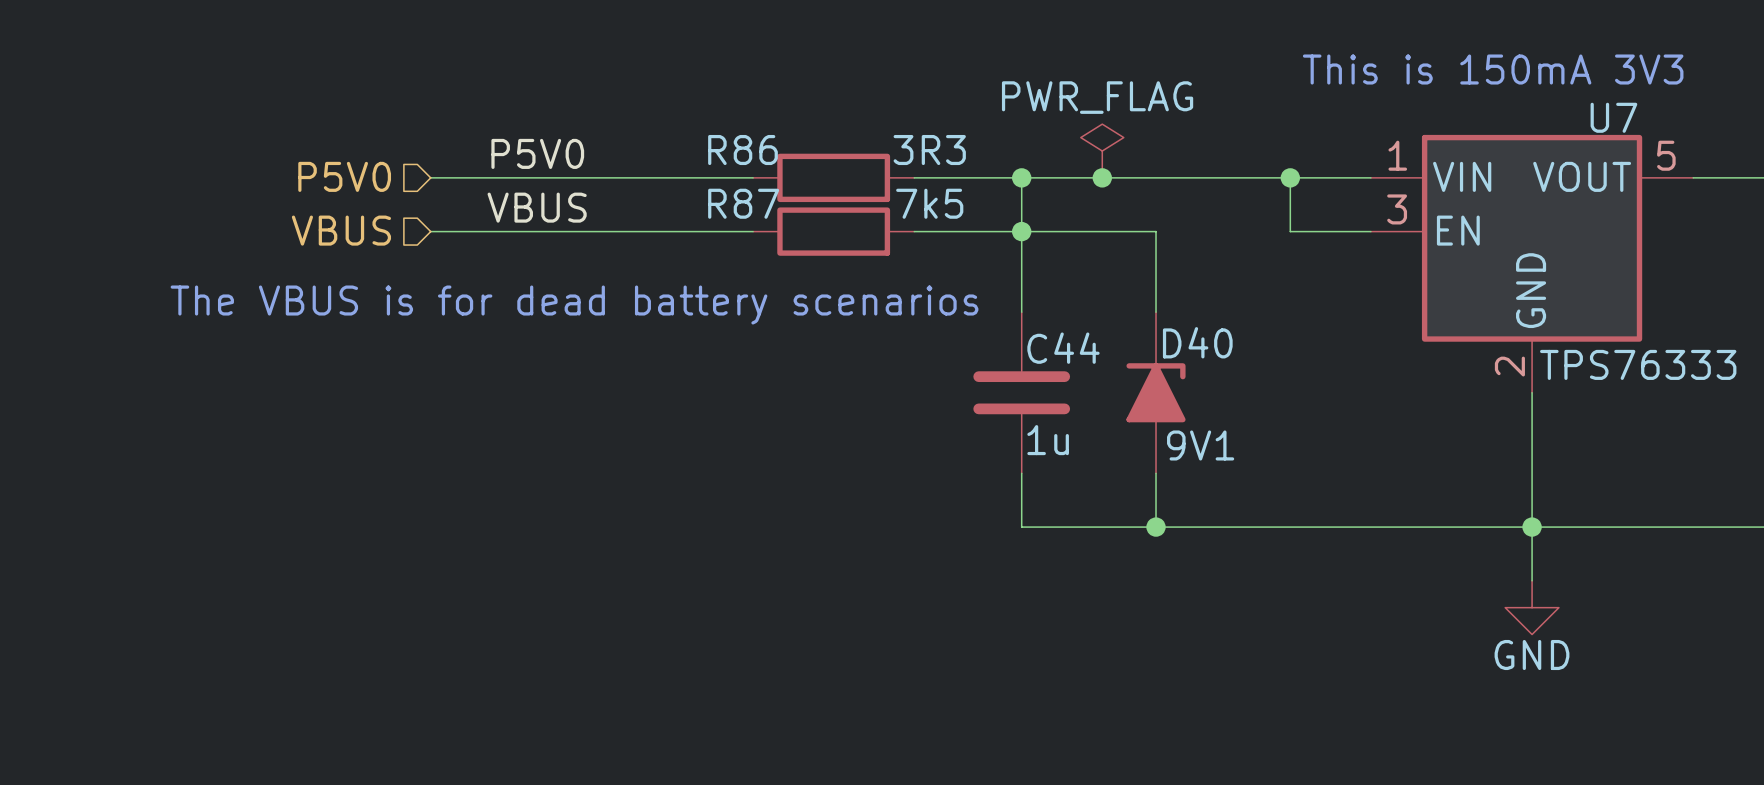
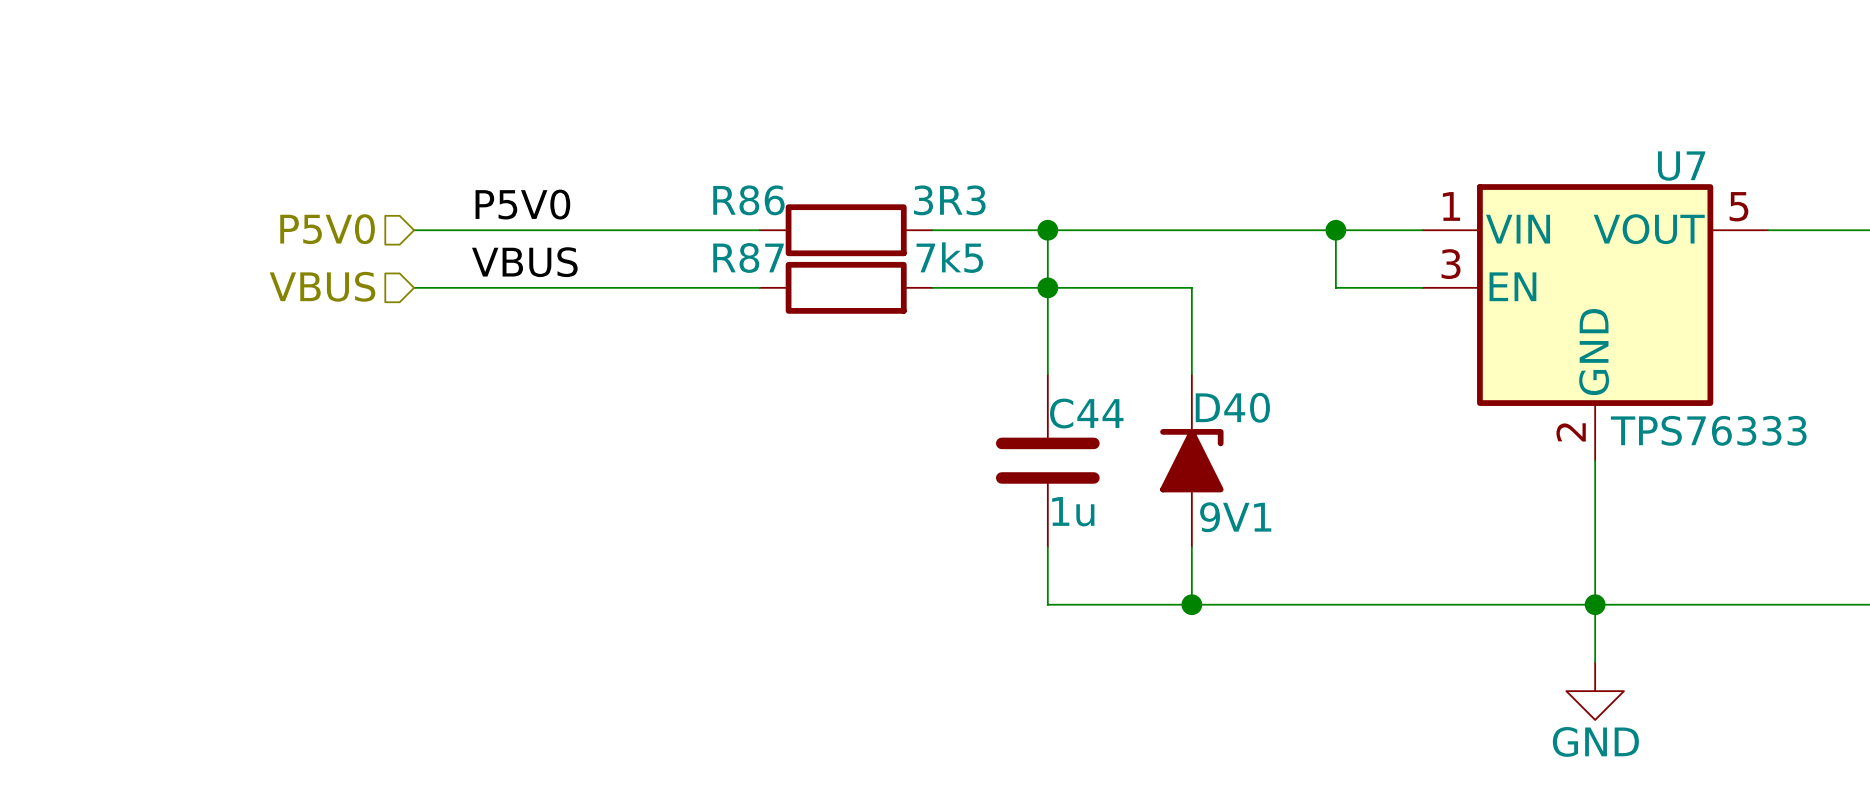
text: This is 150mA 3V3 (1493, 69) -> none
power symbol: PWR_FLAG (1102, 151) -> none
junction: (1102, 177) -> none
text: The VBUS is for dead battery scenarios (574, 304) -> none

